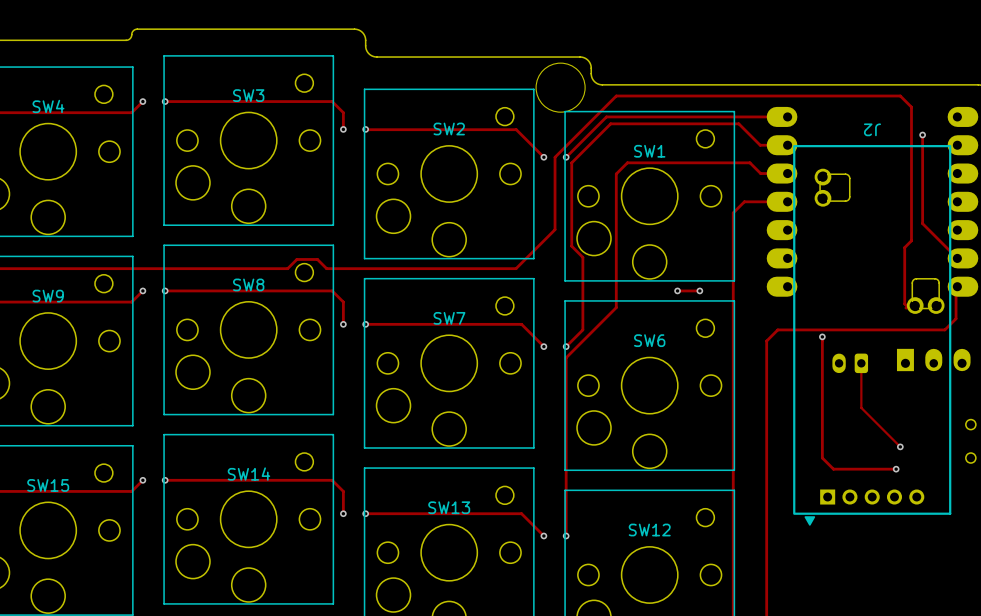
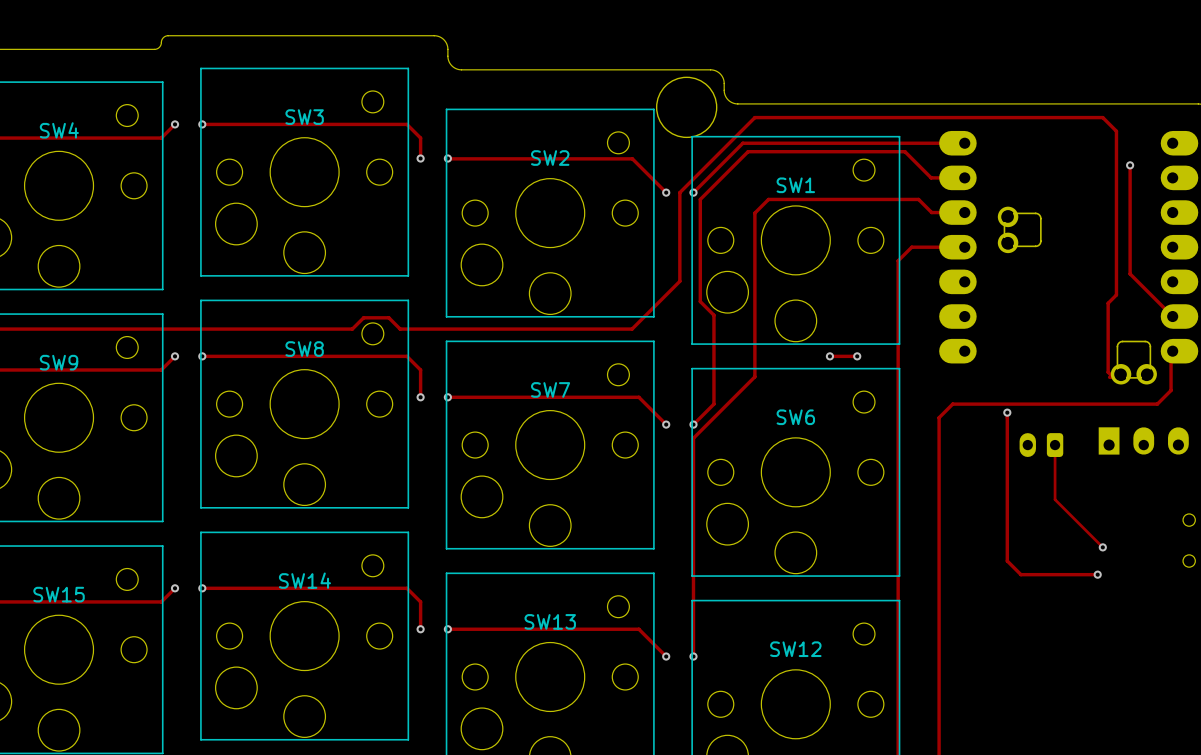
J2: (872, 335) -> none

